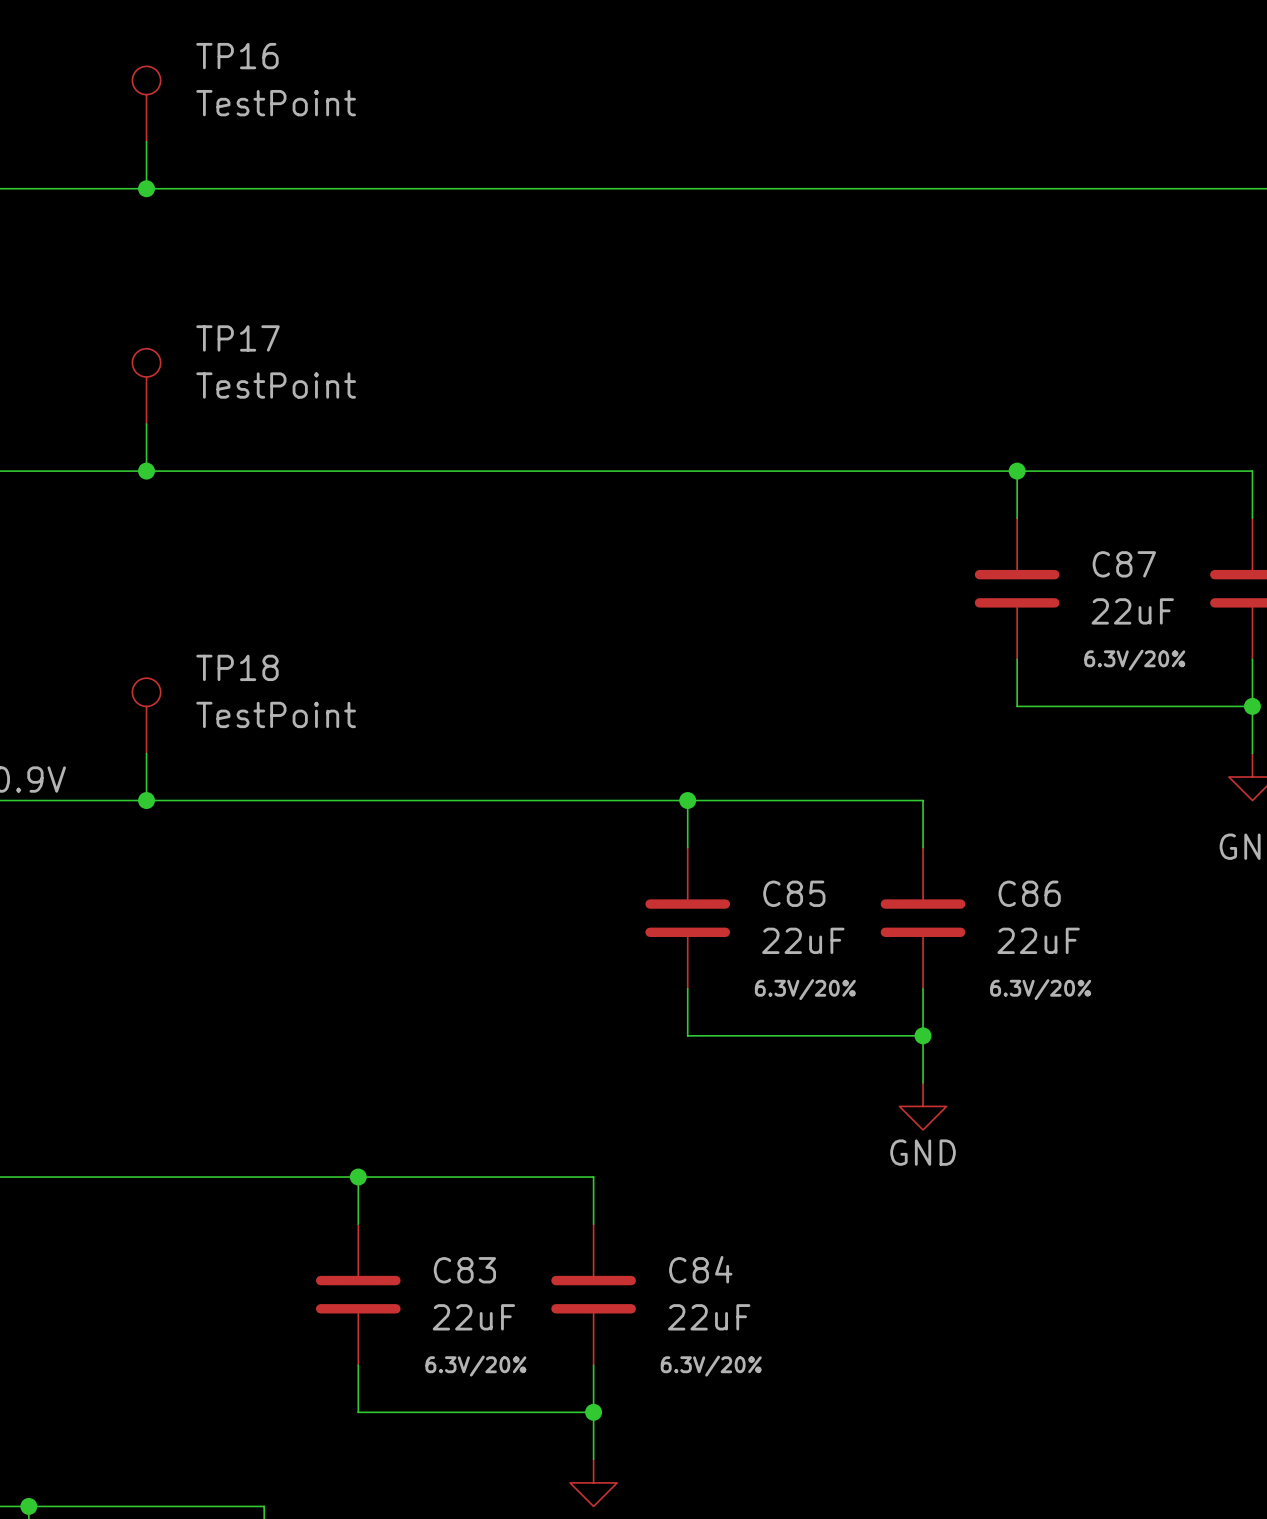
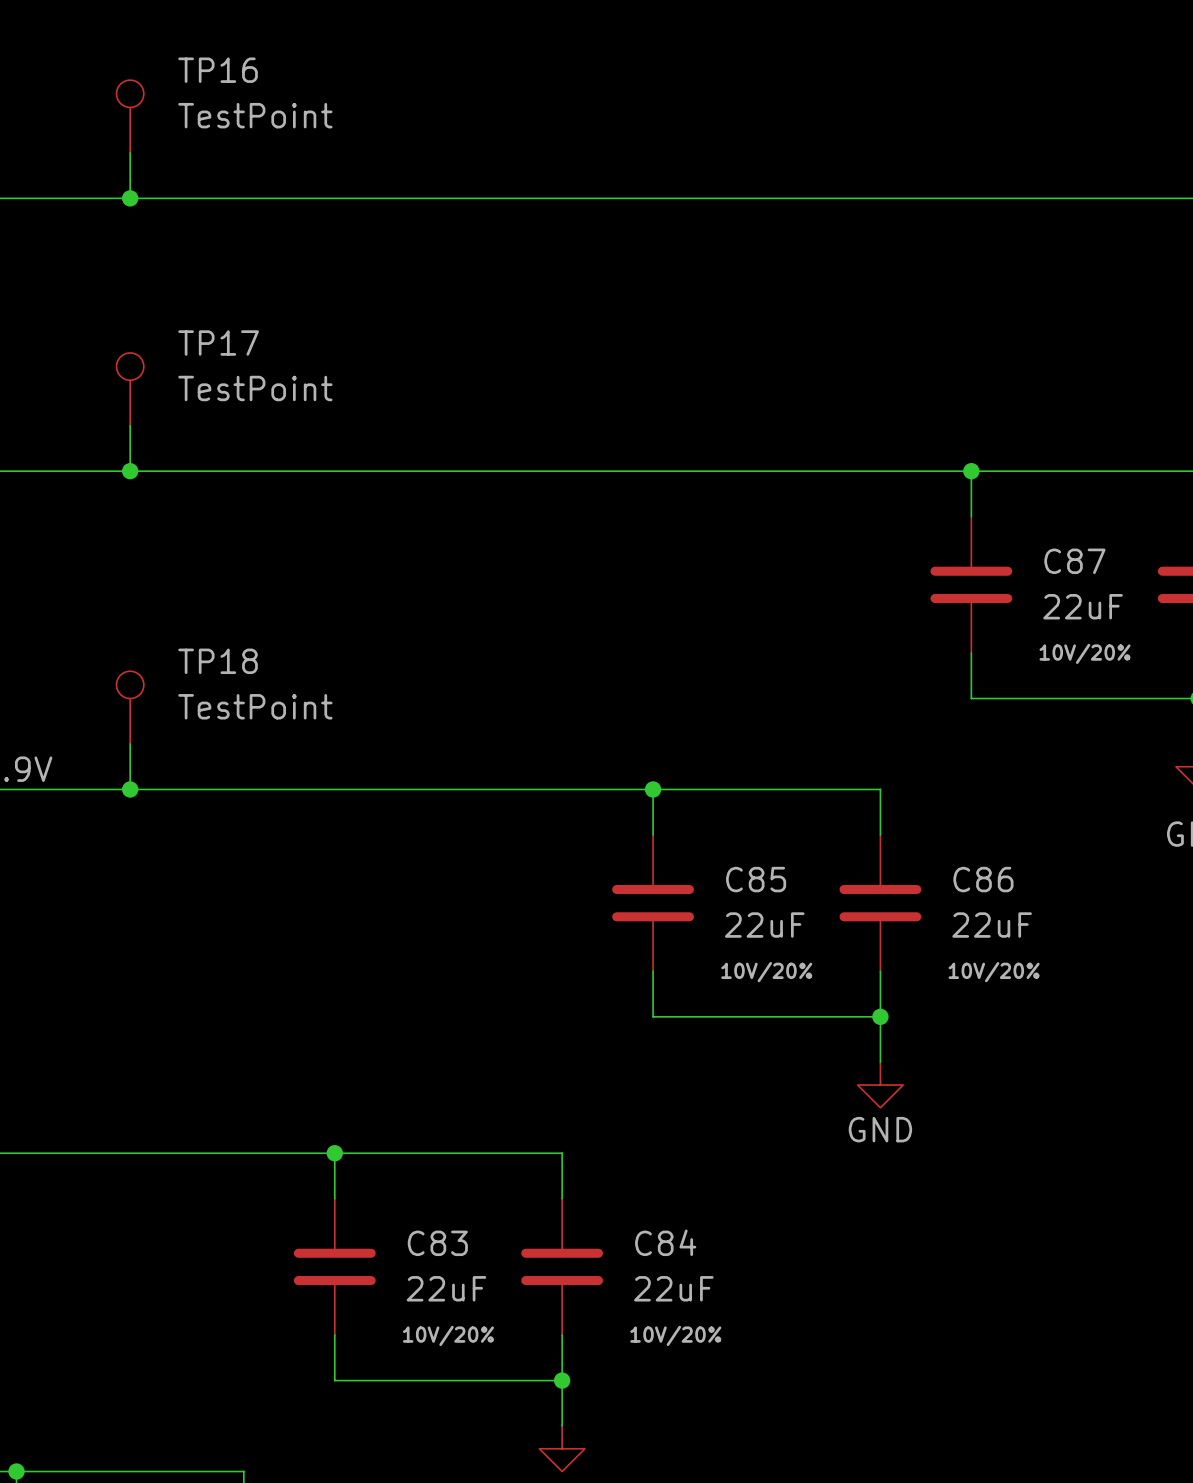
C87 text: 6.3V/20% (1134, 660) -> 10V/20% (1085, 653)
C85 text: 6.3V/20% (805, 989) -> 10V/20% (766, 972)
C86 text: 6.3V/20% (1040, 989) -> 10V/20% (994, 972)
C83 text: 6.3V/20% (475, 1366) -> 10V/20% (448, 1335)
C84 text: 6.3V/20% (711, 1366) -> 10V/20% (675, 1335)

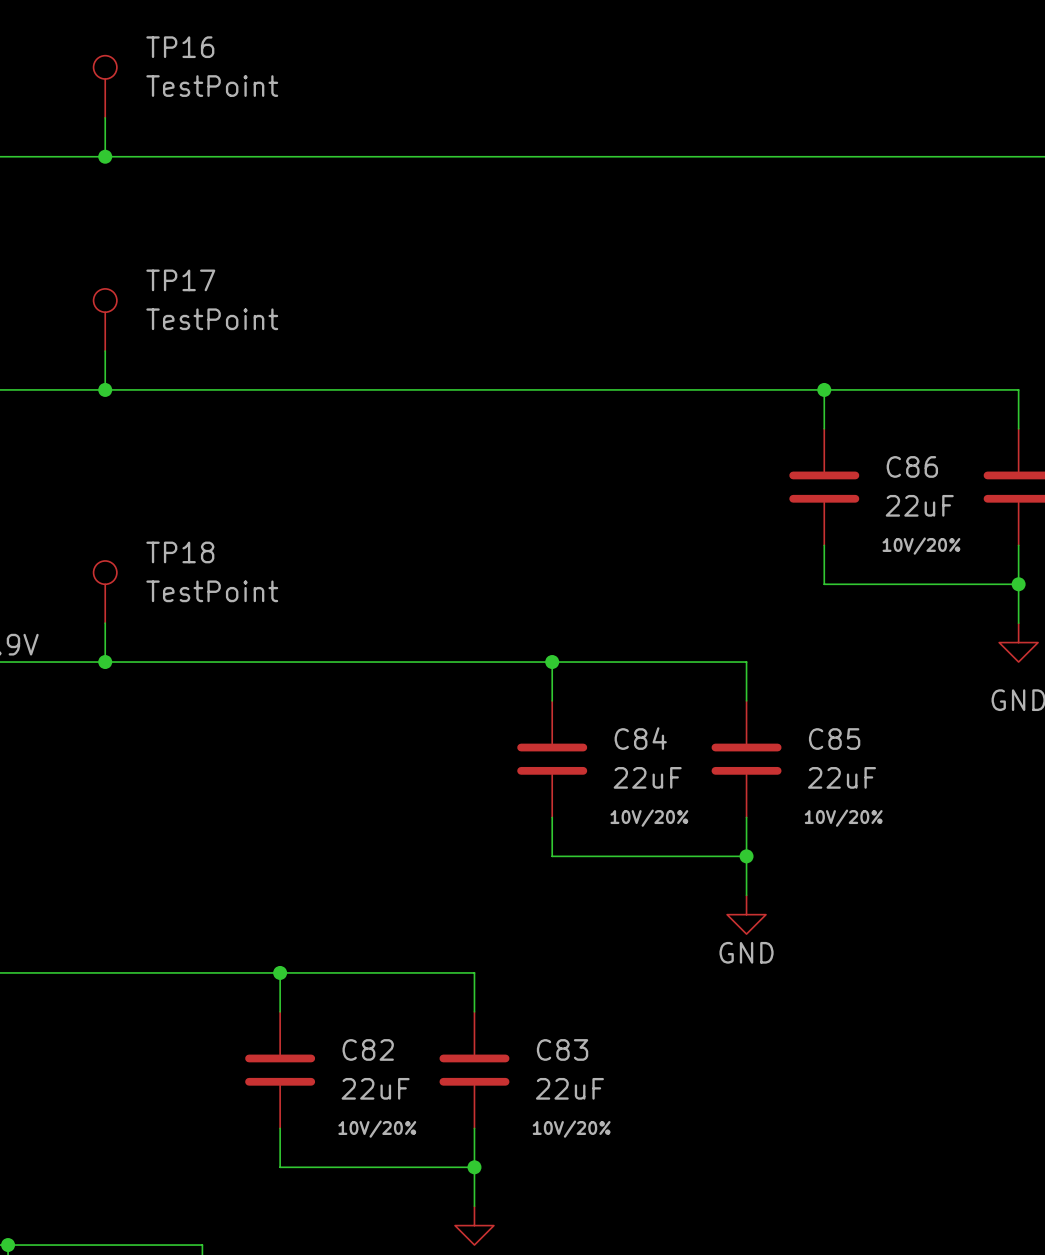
C87 name: C87 (1074, 561) -> C86 (912, 466)
C85 name: C85 (756, 879) -> C84 (640, 738)
C86 name: C86 (983, 879) -> C85 (834, 739)
C84 name: C84 (665, 1242) -> C83 (562, 1049)
C83 name: C83 (437, 1243) -> C82 (368, 1049)

